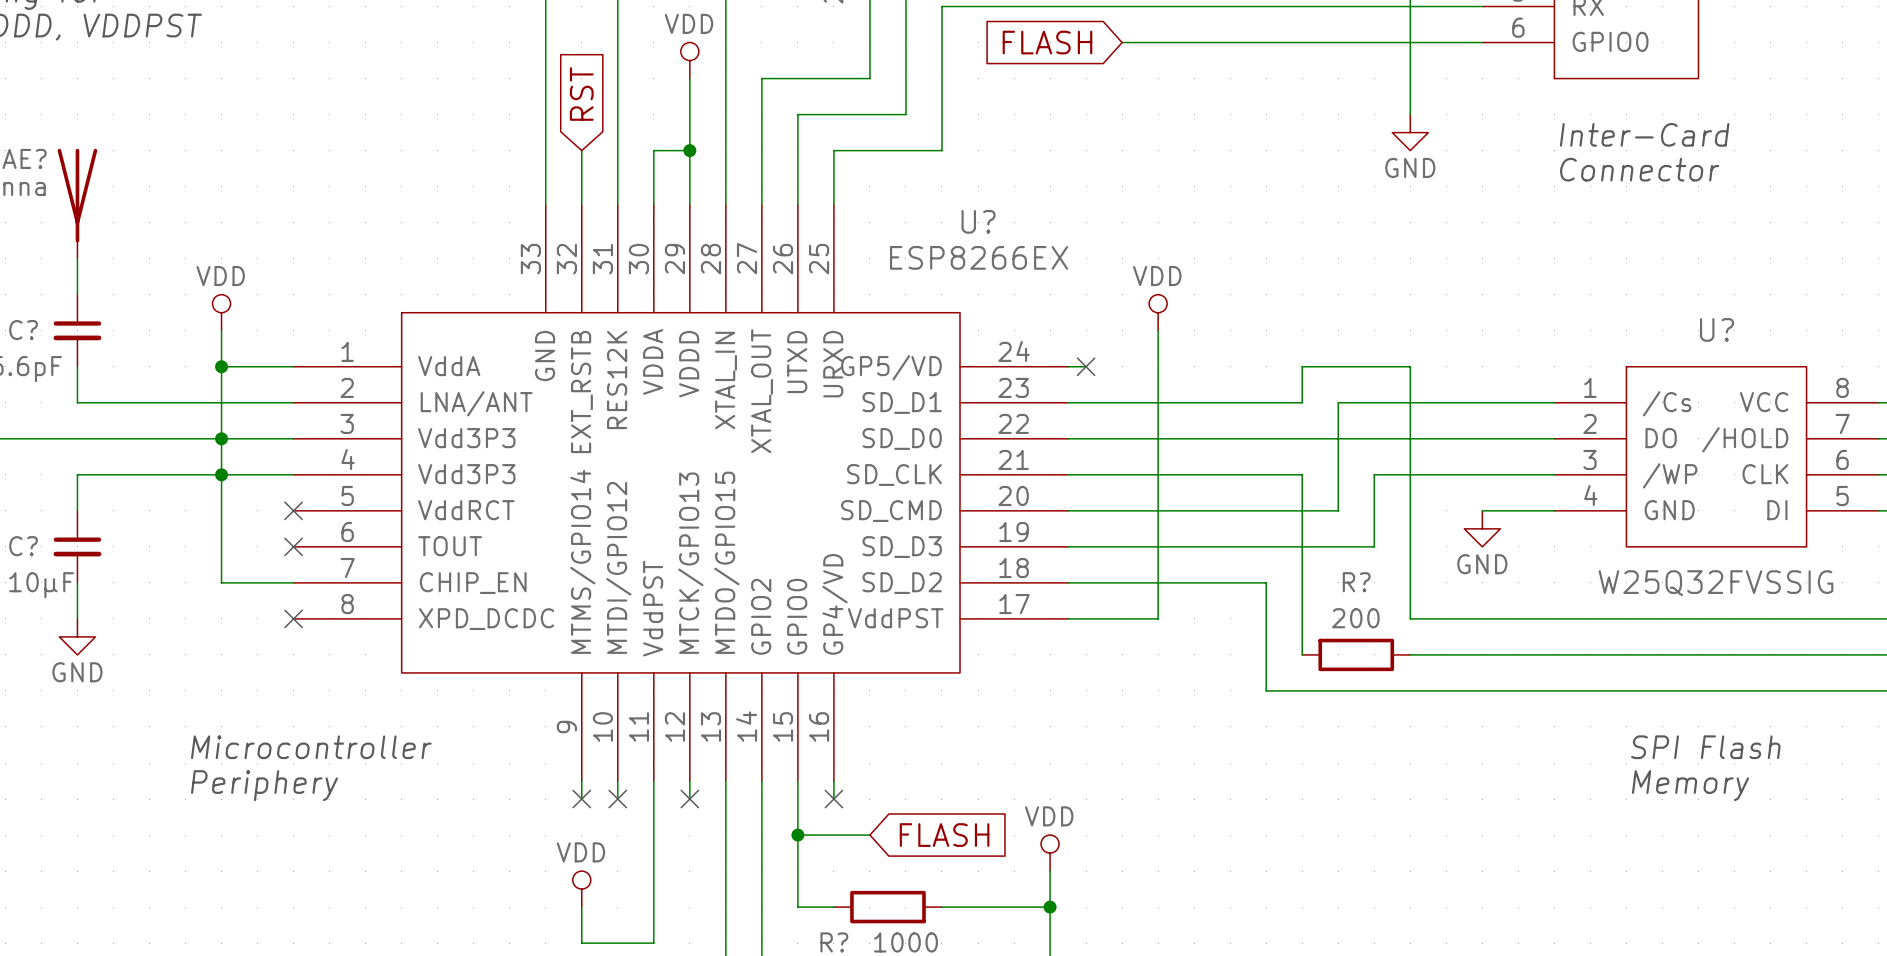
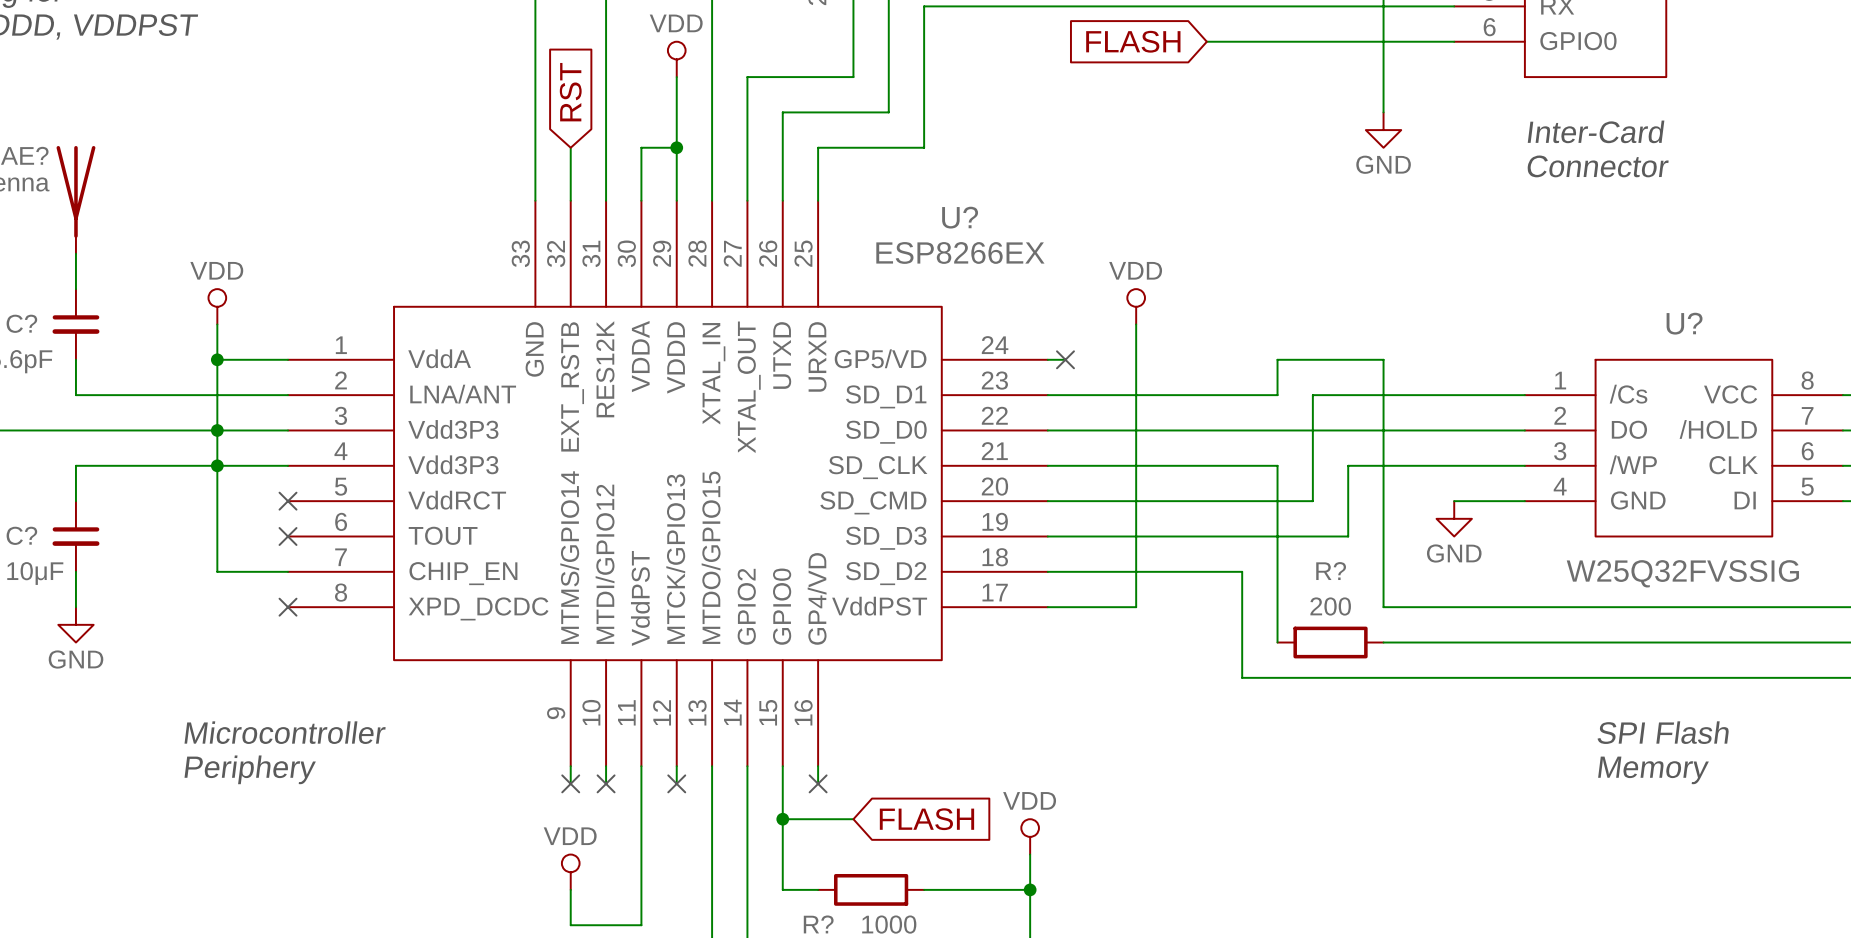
global label position: FLASH (1047, 42) -> FLASH (1133, 41)
wire: (1122, 42) (1230, 42) -> none

